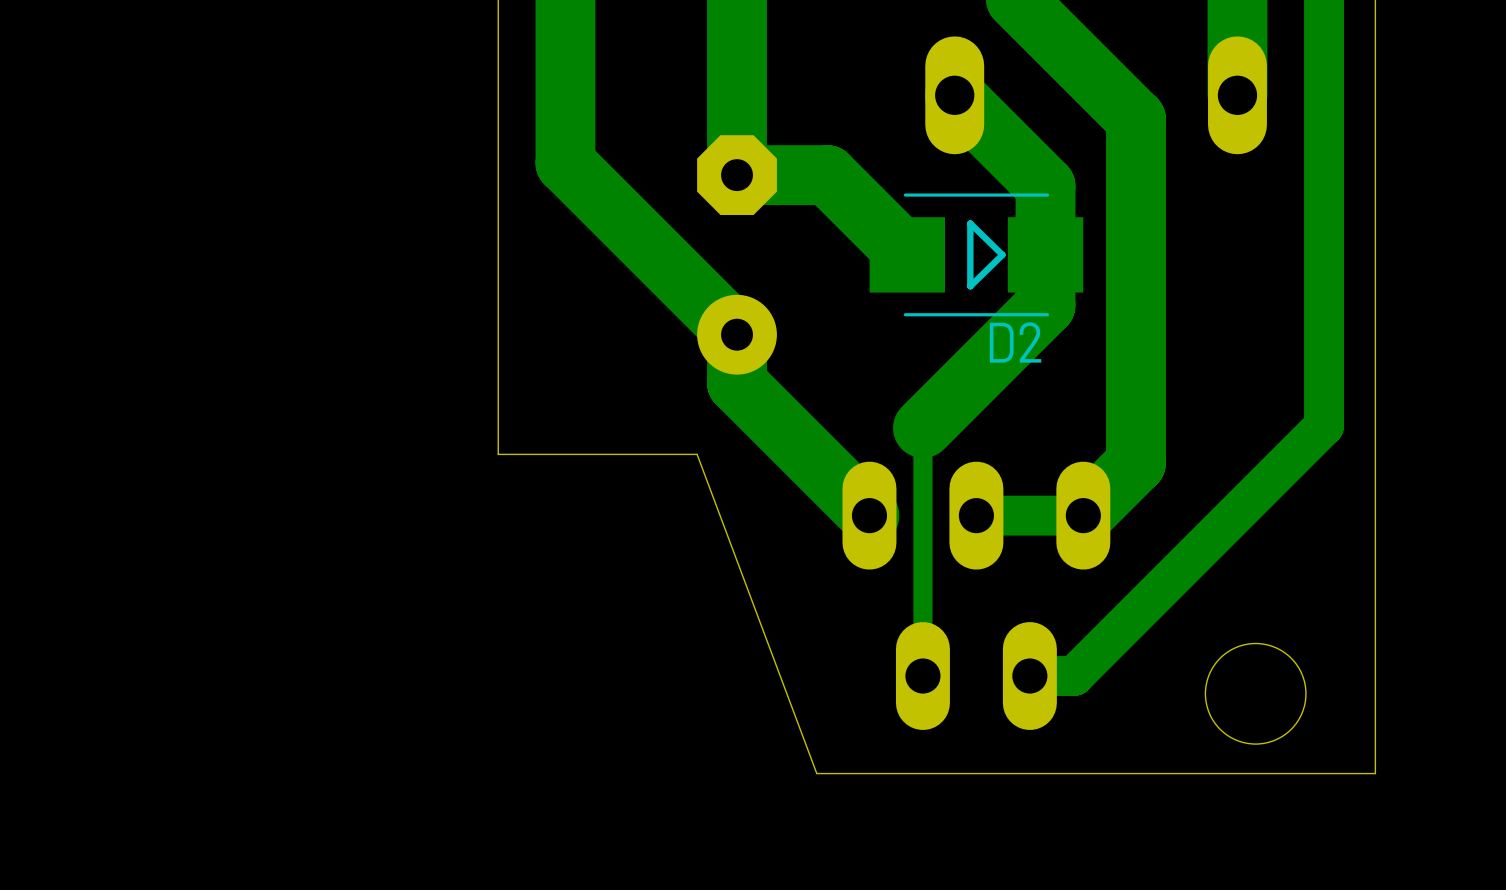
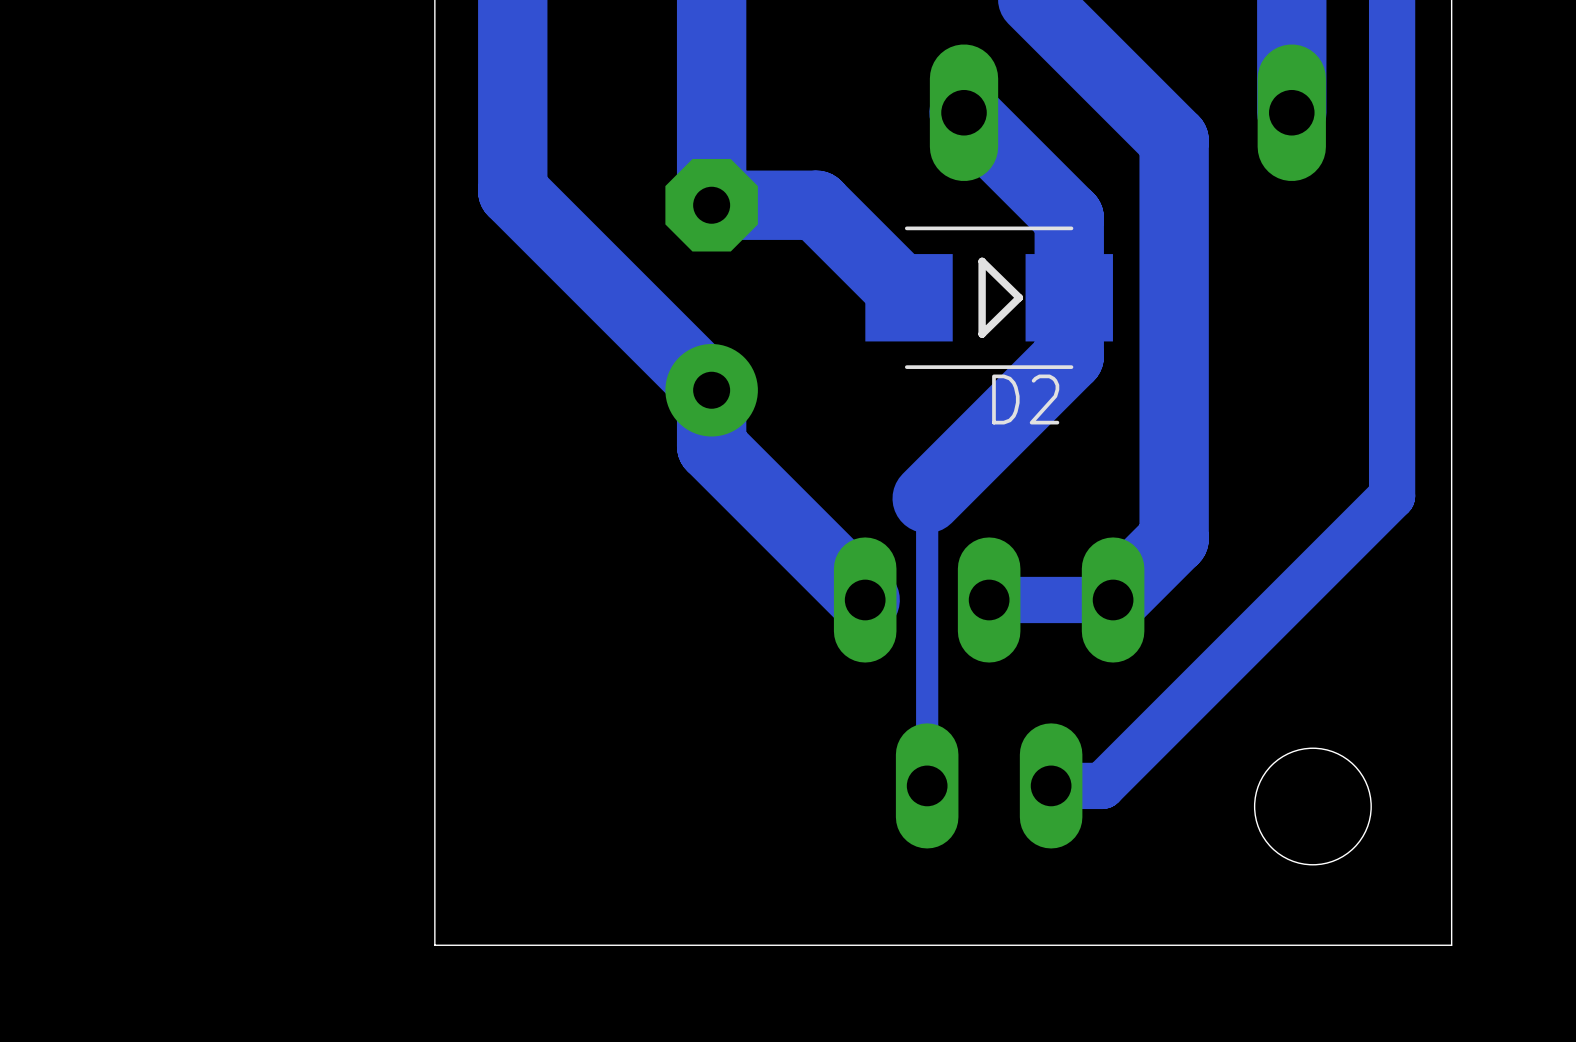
board edge: (498, 454) (697, 454) (816, 773) (1375, 773) -> (434, 529) (434, 945) (1451, 945) (1451, 899)

